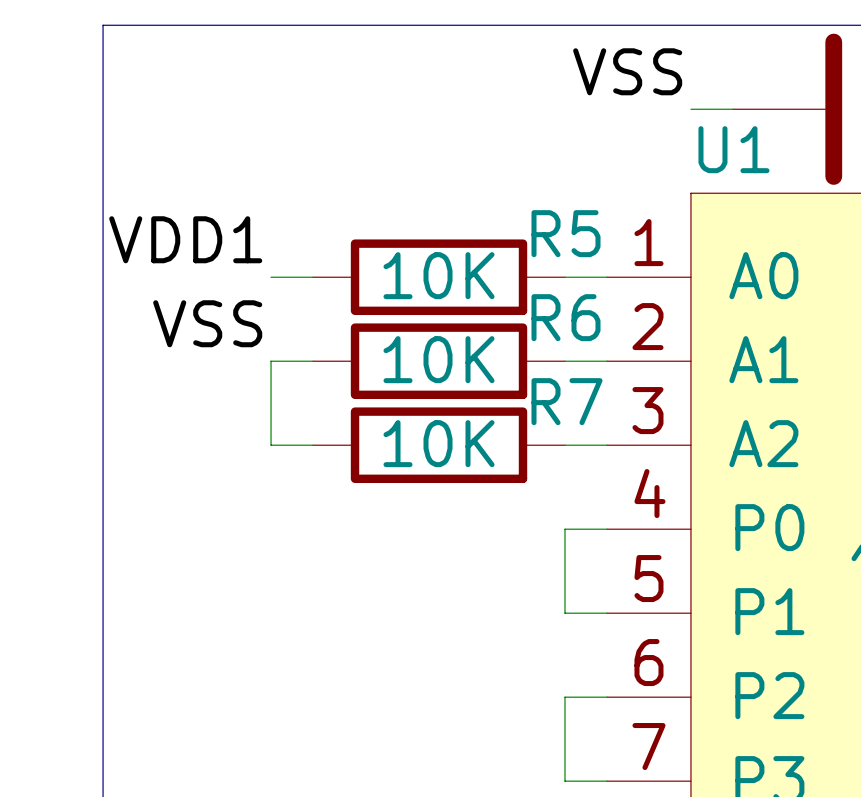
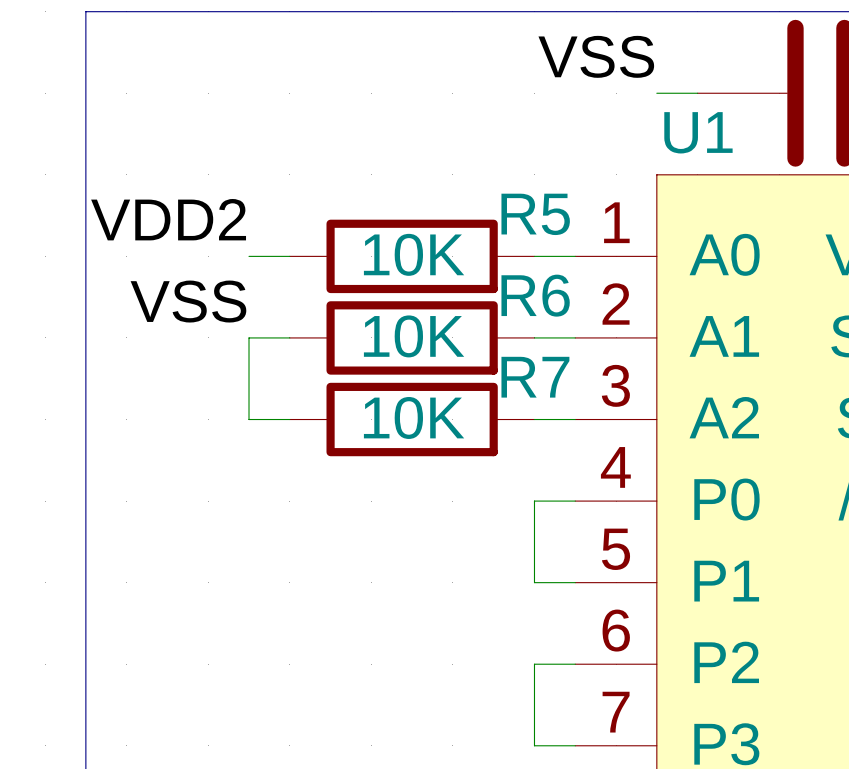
label: VDD1 (185, 239) -> VDD2 (168, 219)

